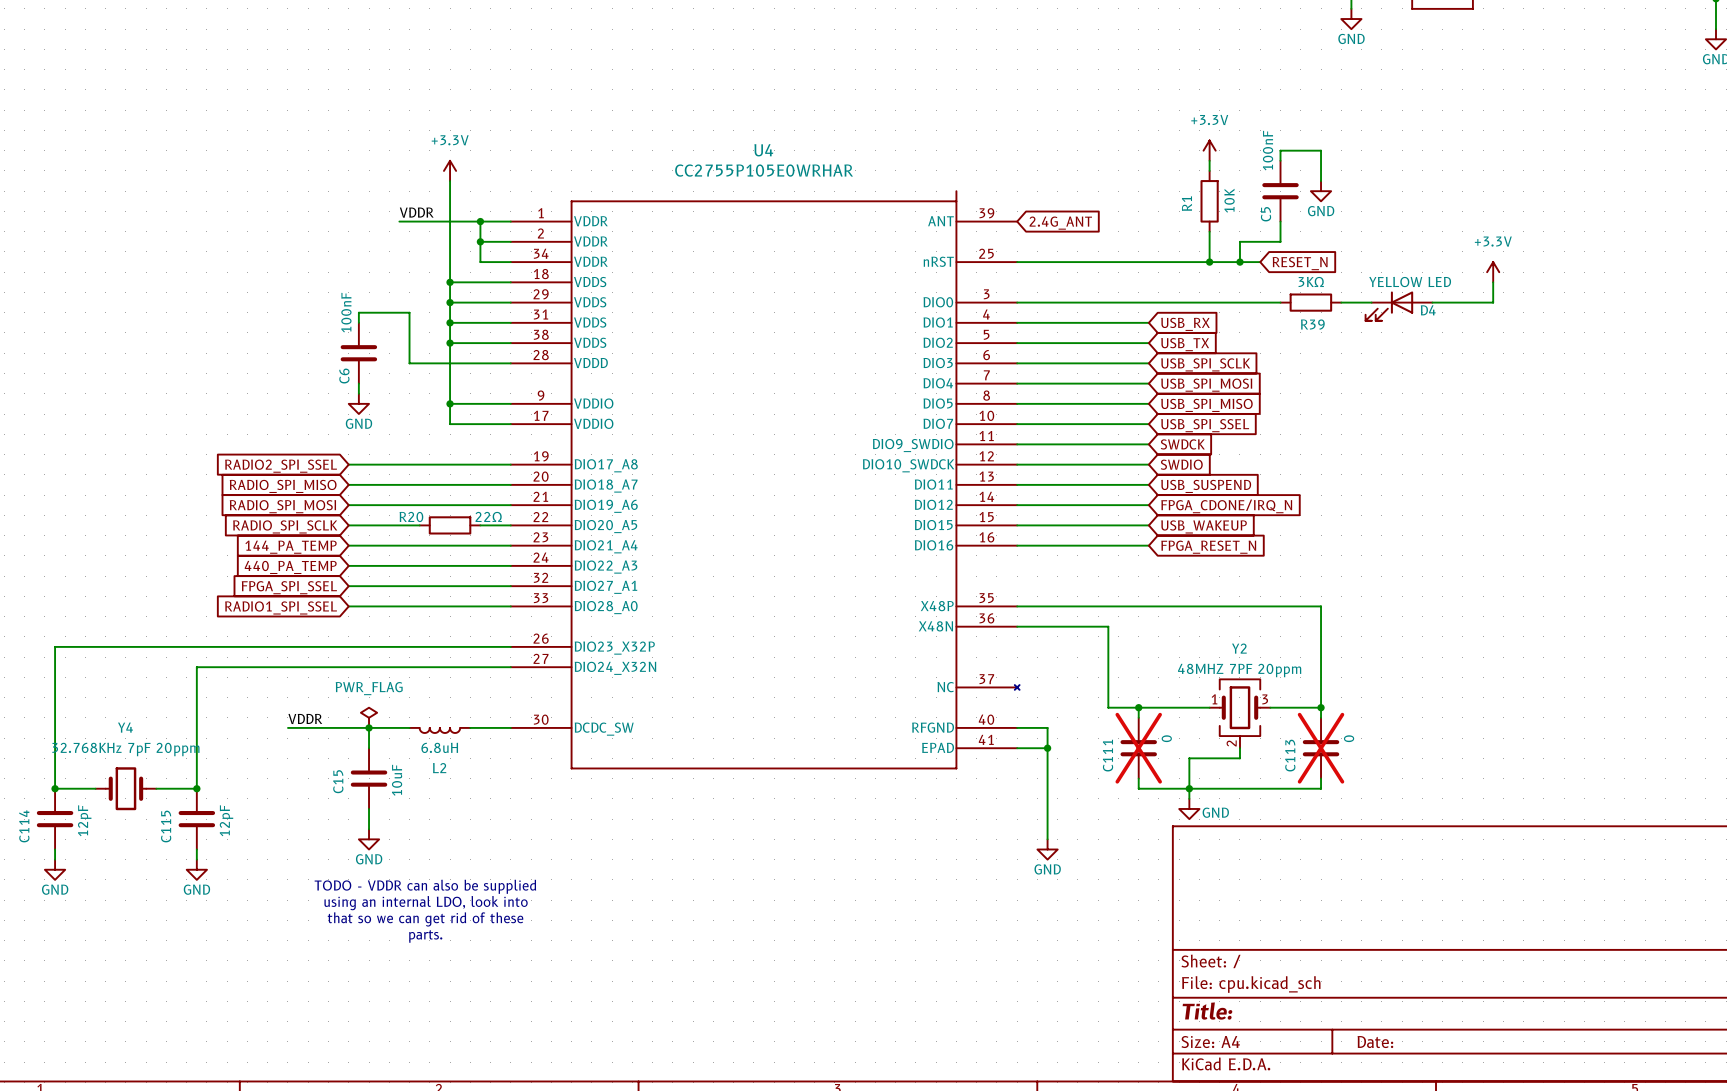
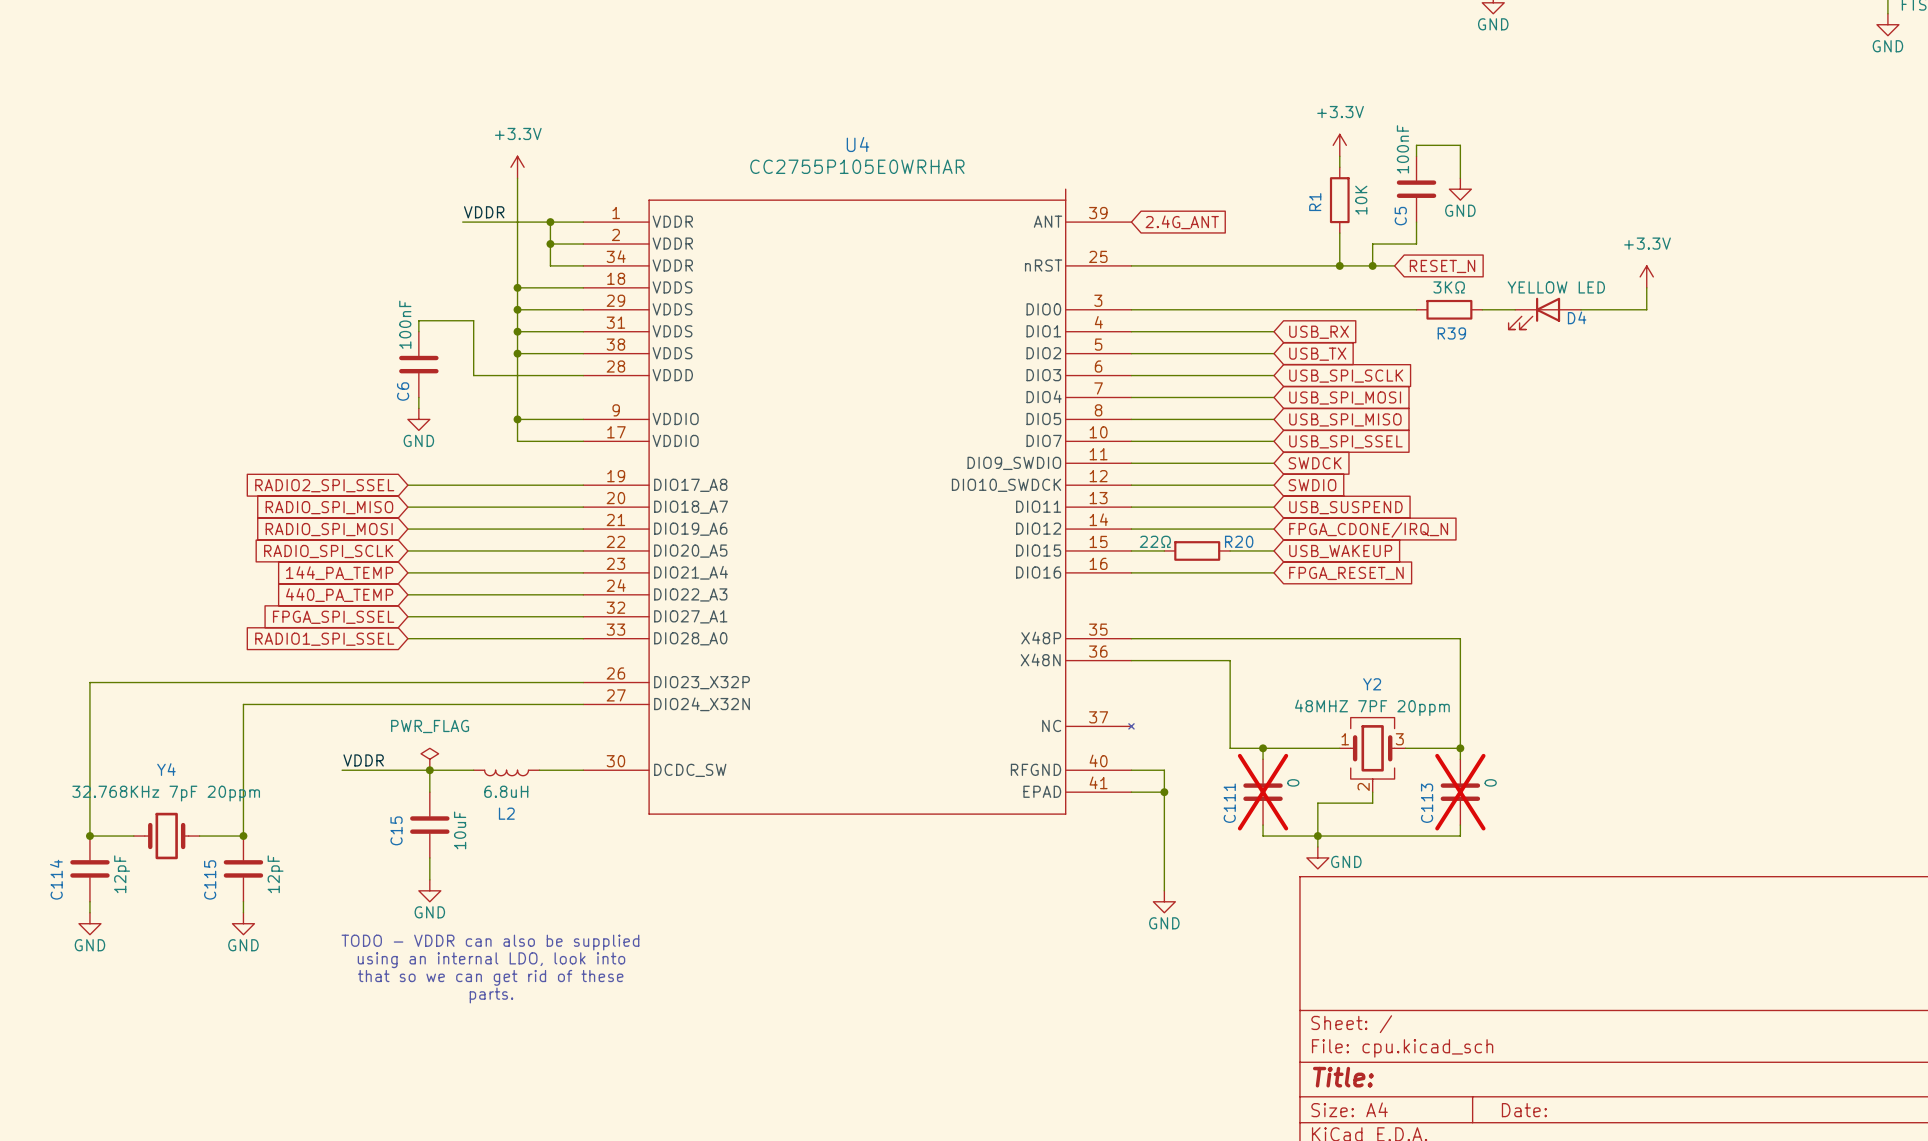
R20 name position: R20 (411, 516) -> R20 (1239, 541)
R20 value position: 22Ω (488, 516) -> 22Ω (1155, 541)
wire: none -> (484, 550) (550, 550)
R20 position: (450, 525) -> (1197, 550)
wire: (1047, 525) (1108, 525) -> none

